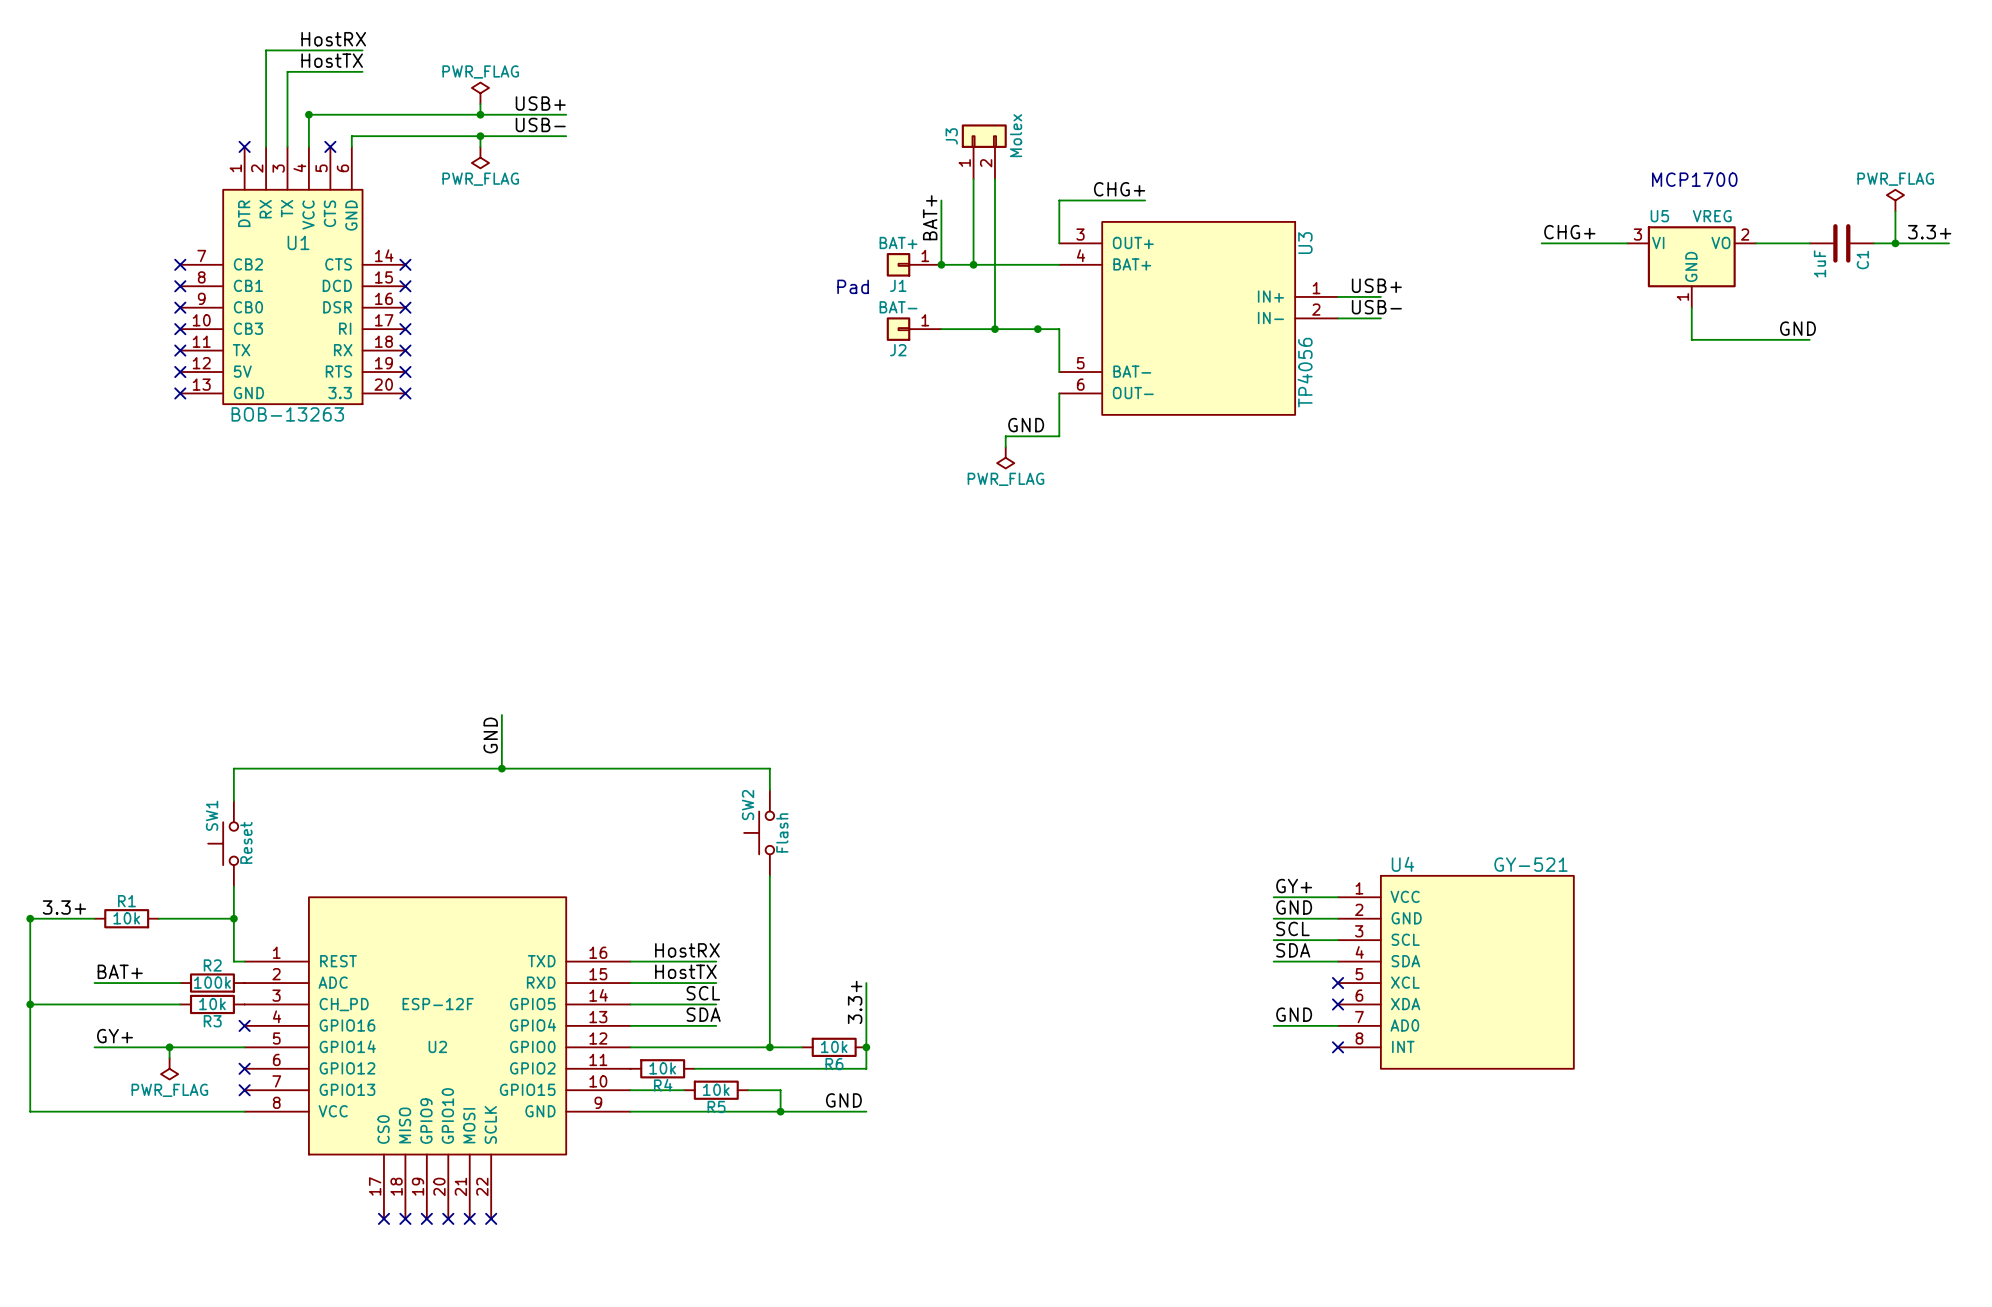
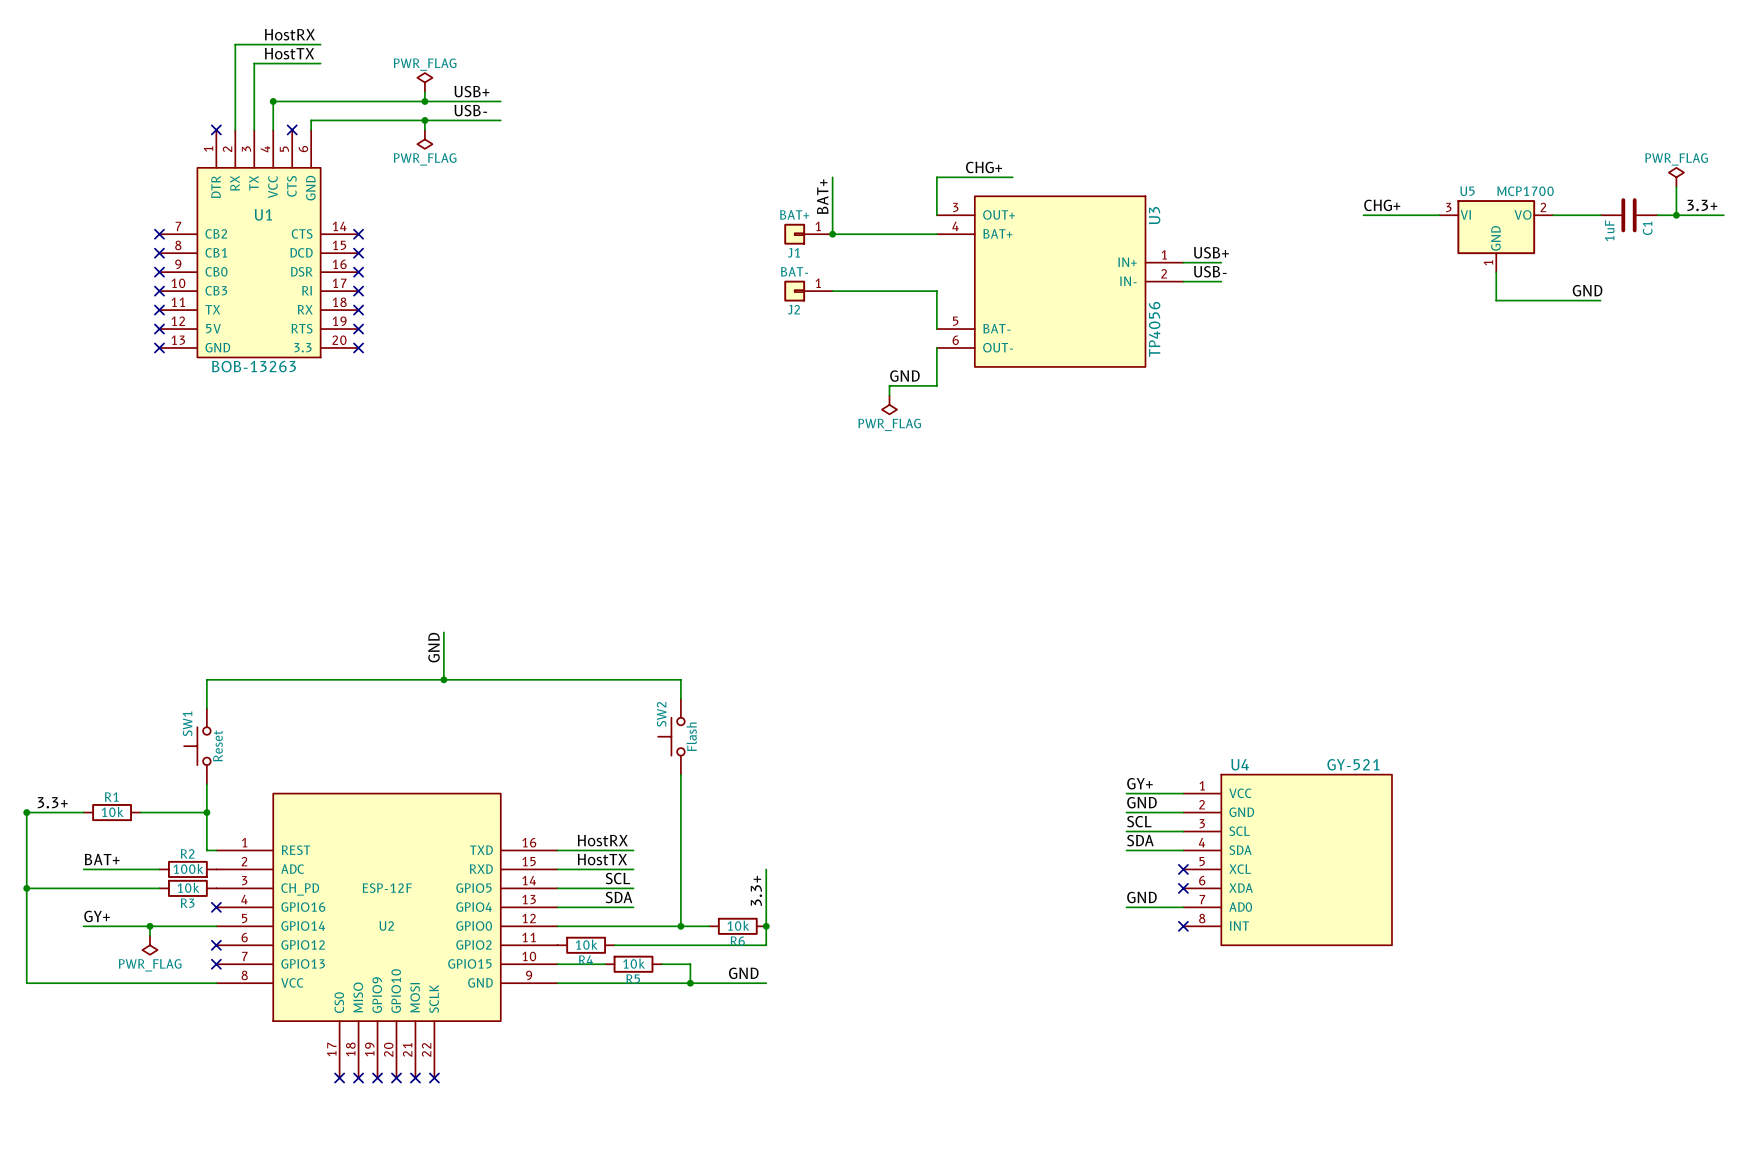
J3: Molex (984, 151) -> none
wire: (973, 179) (973, 264) -> none
wire: (994, 179) (994, 329) -> none
text: MCP1700 (1694, 179) -> none
U5 value: VREG (1712, 216) -> MCP1700 (1525, 191)
junction: (973, 264) -> none
text: Pad (853, 286) -> none
junction: (994, 329) -> none
junction: (1037, 329) -> none

